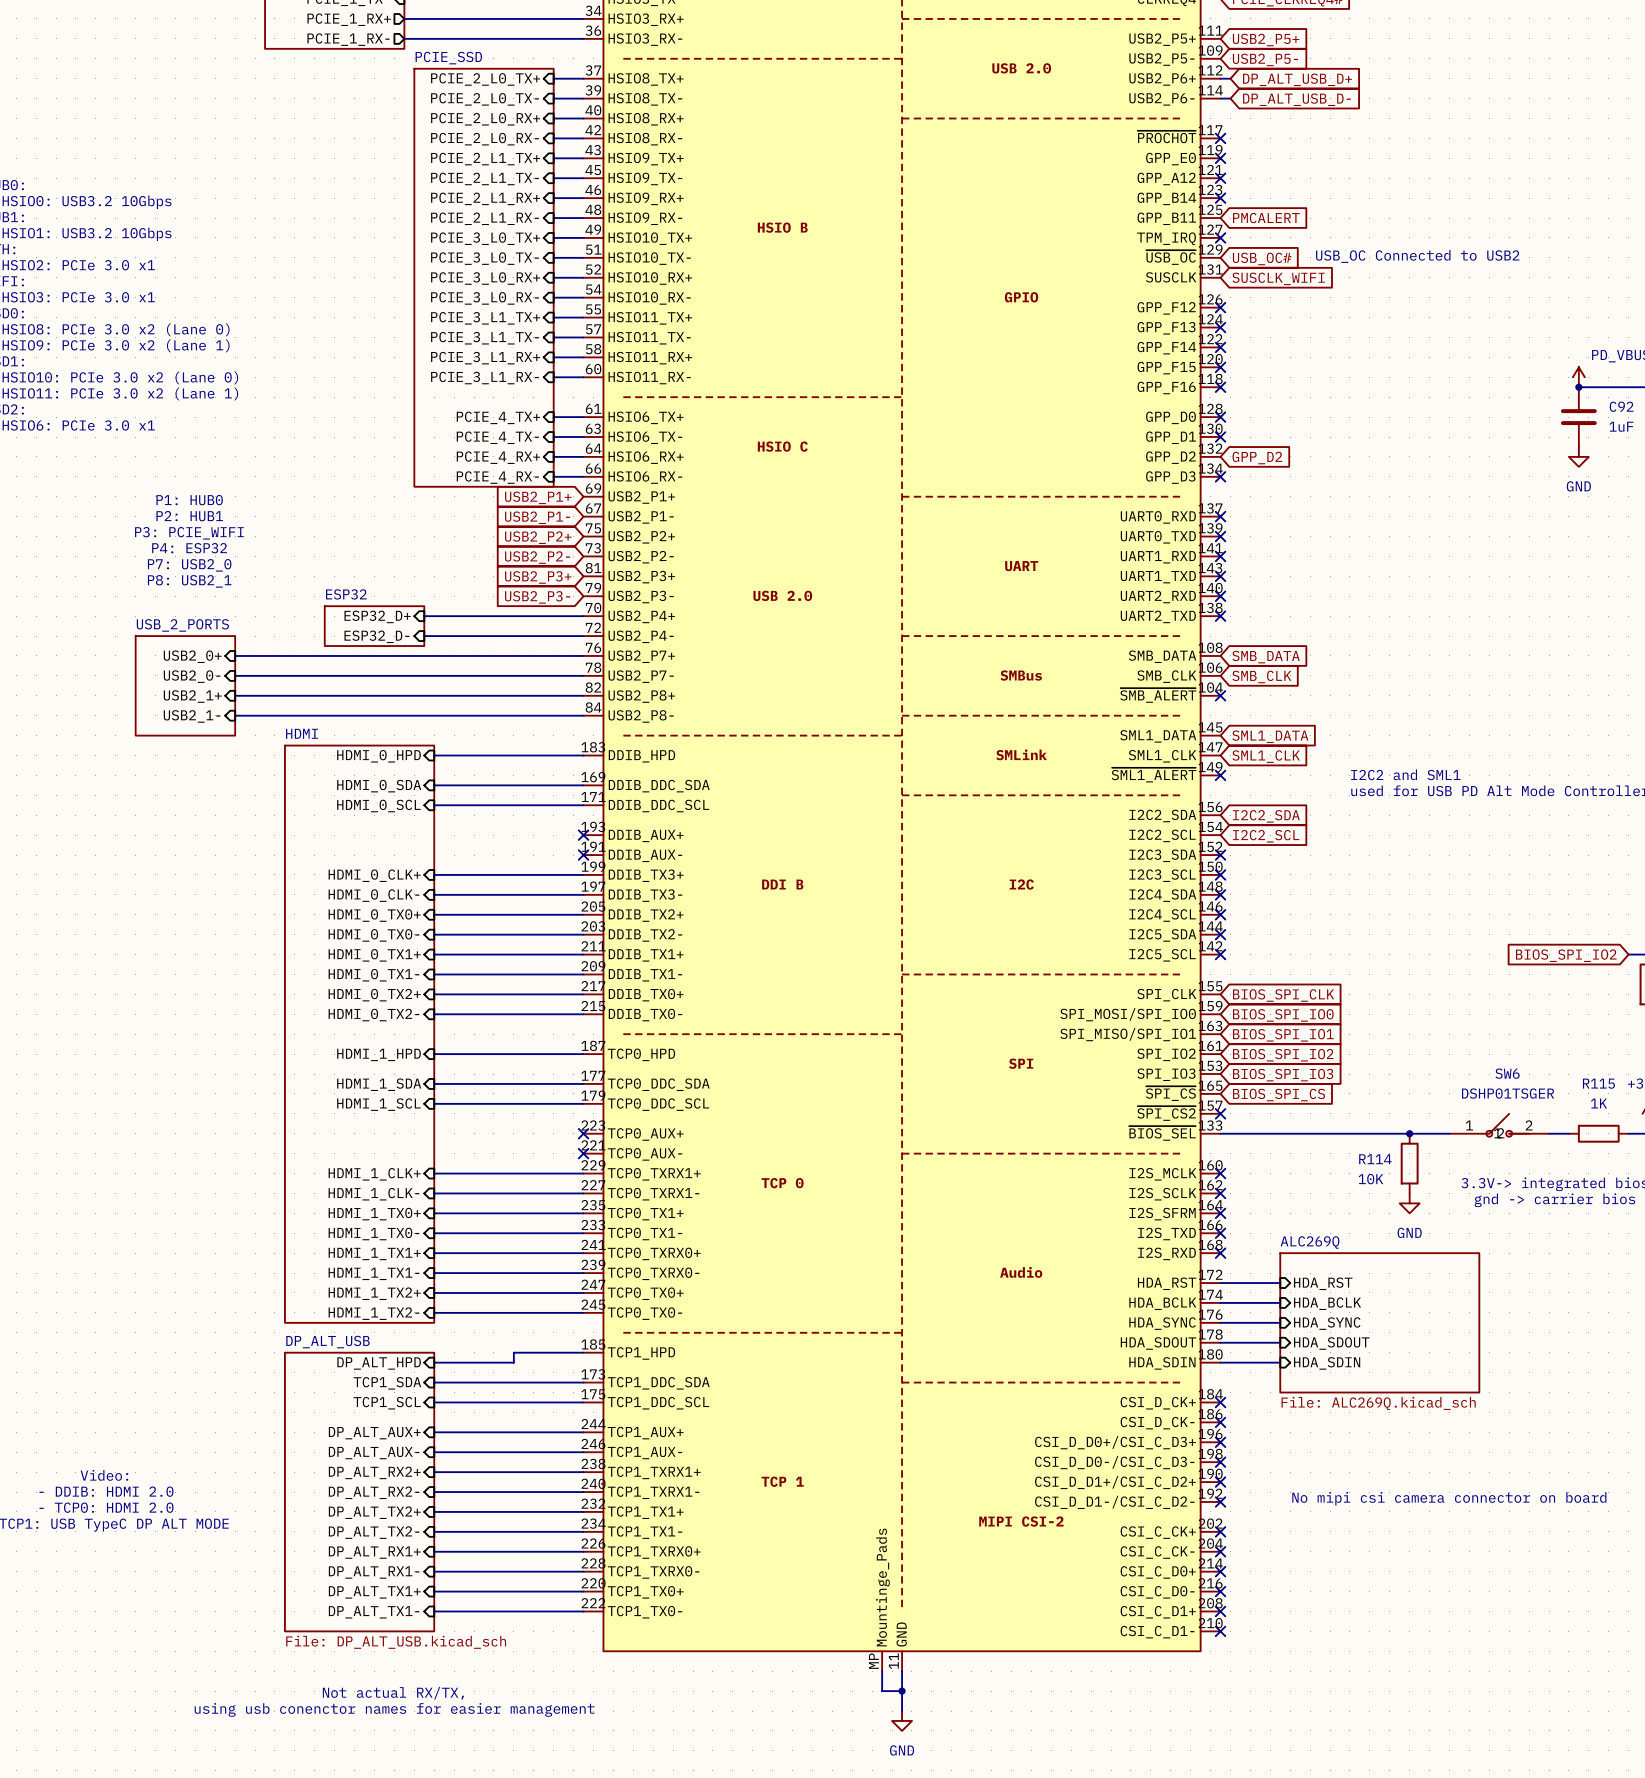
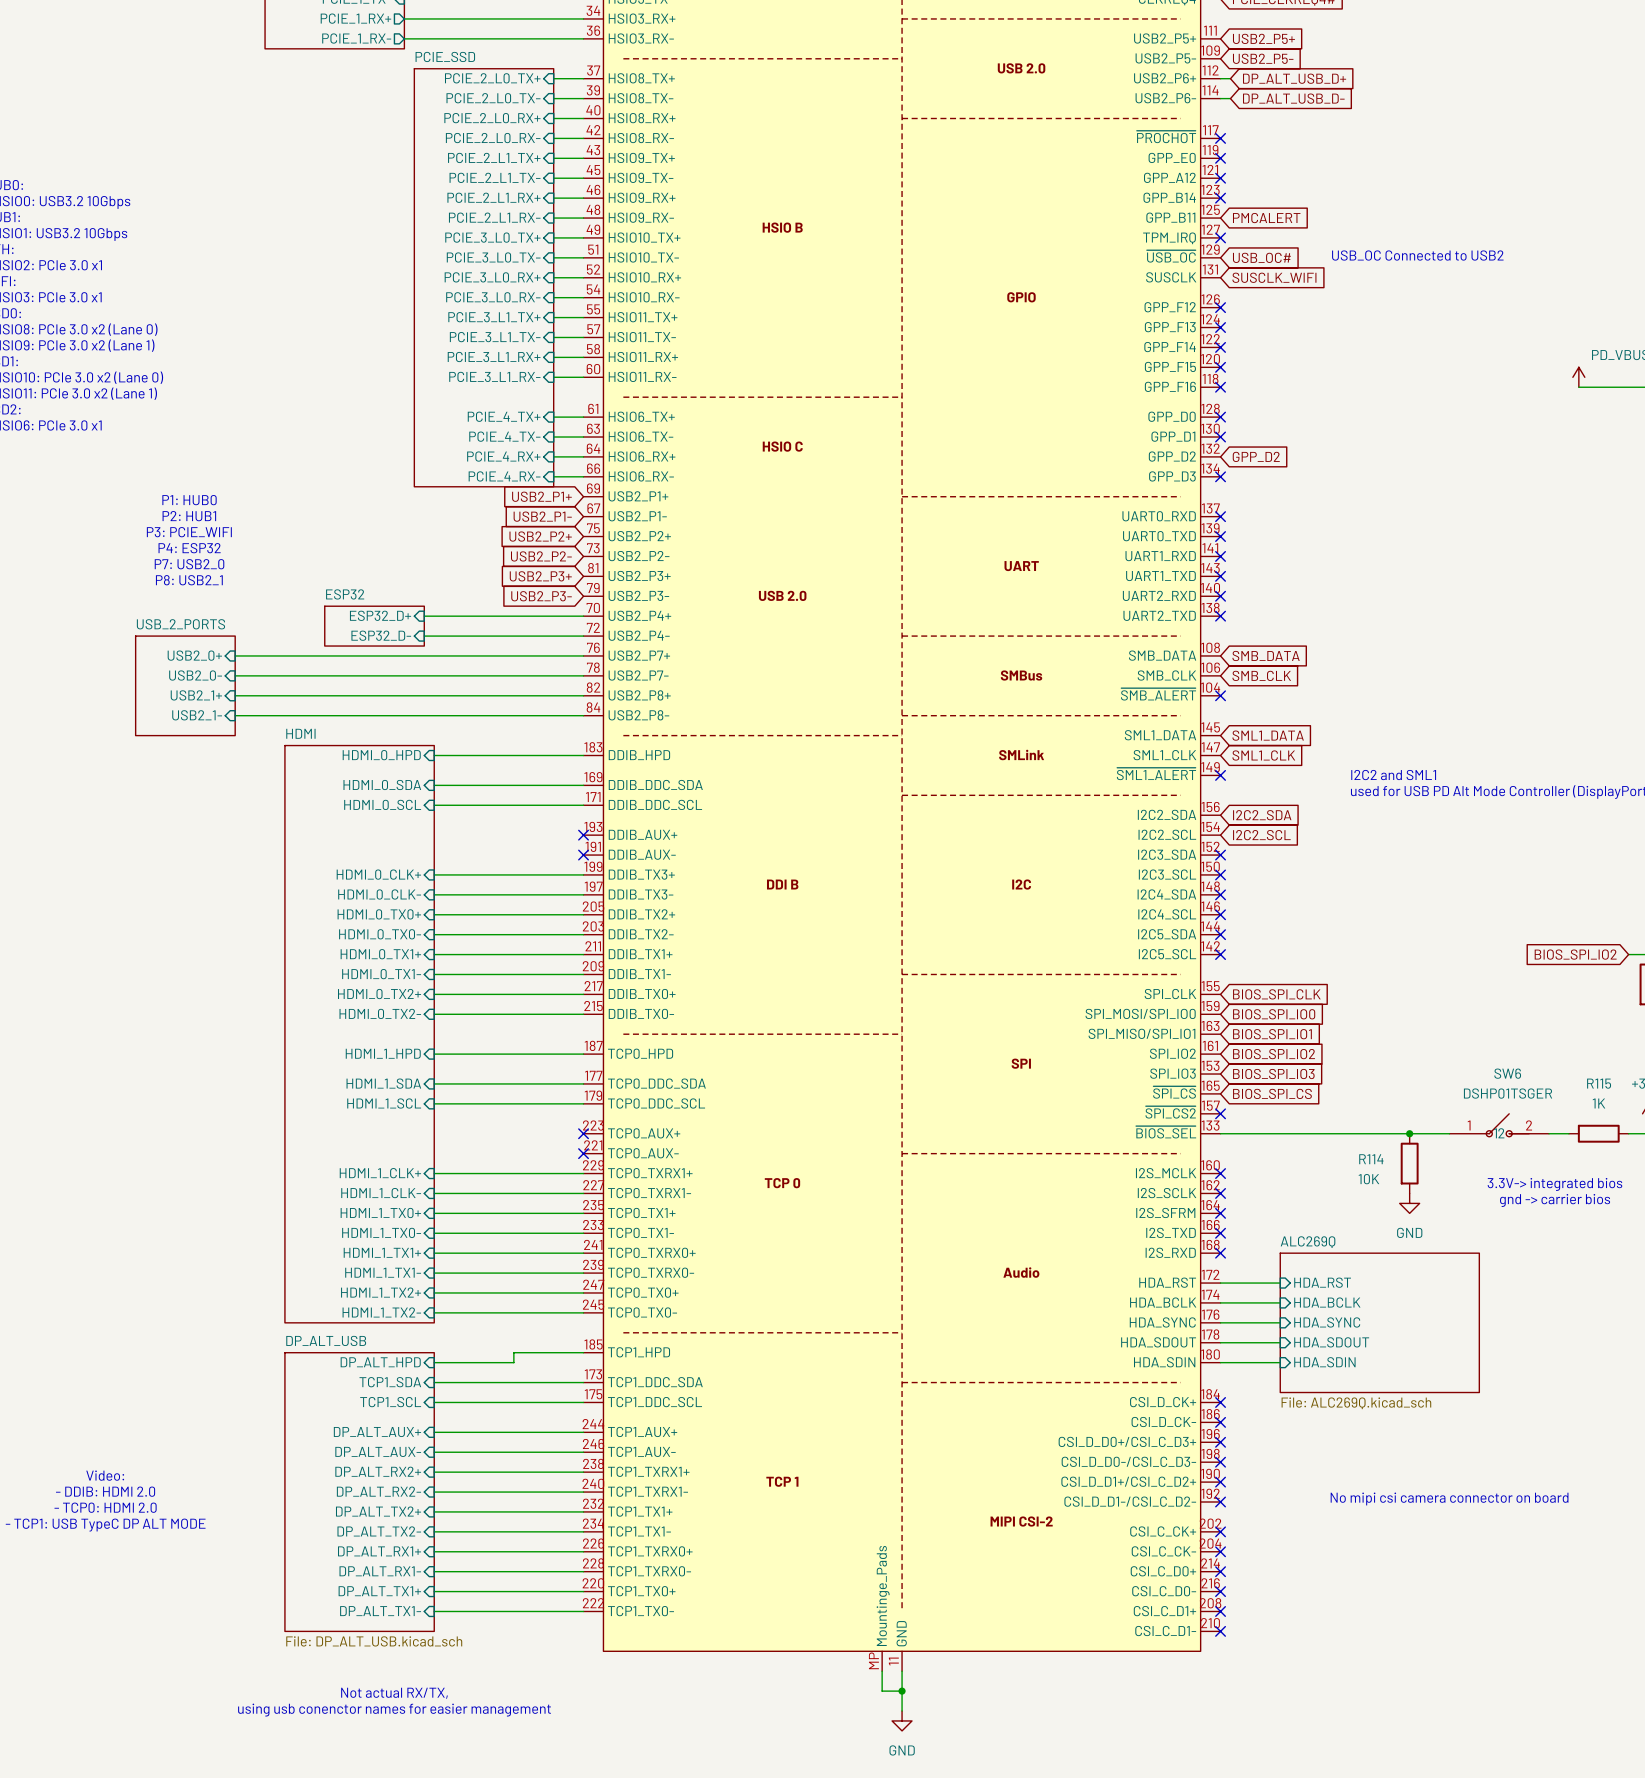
junction: (1578, 387) -> none
C92: 1uF (1578, 417) -> none
power symbol: GND (1578, 456) -> none

